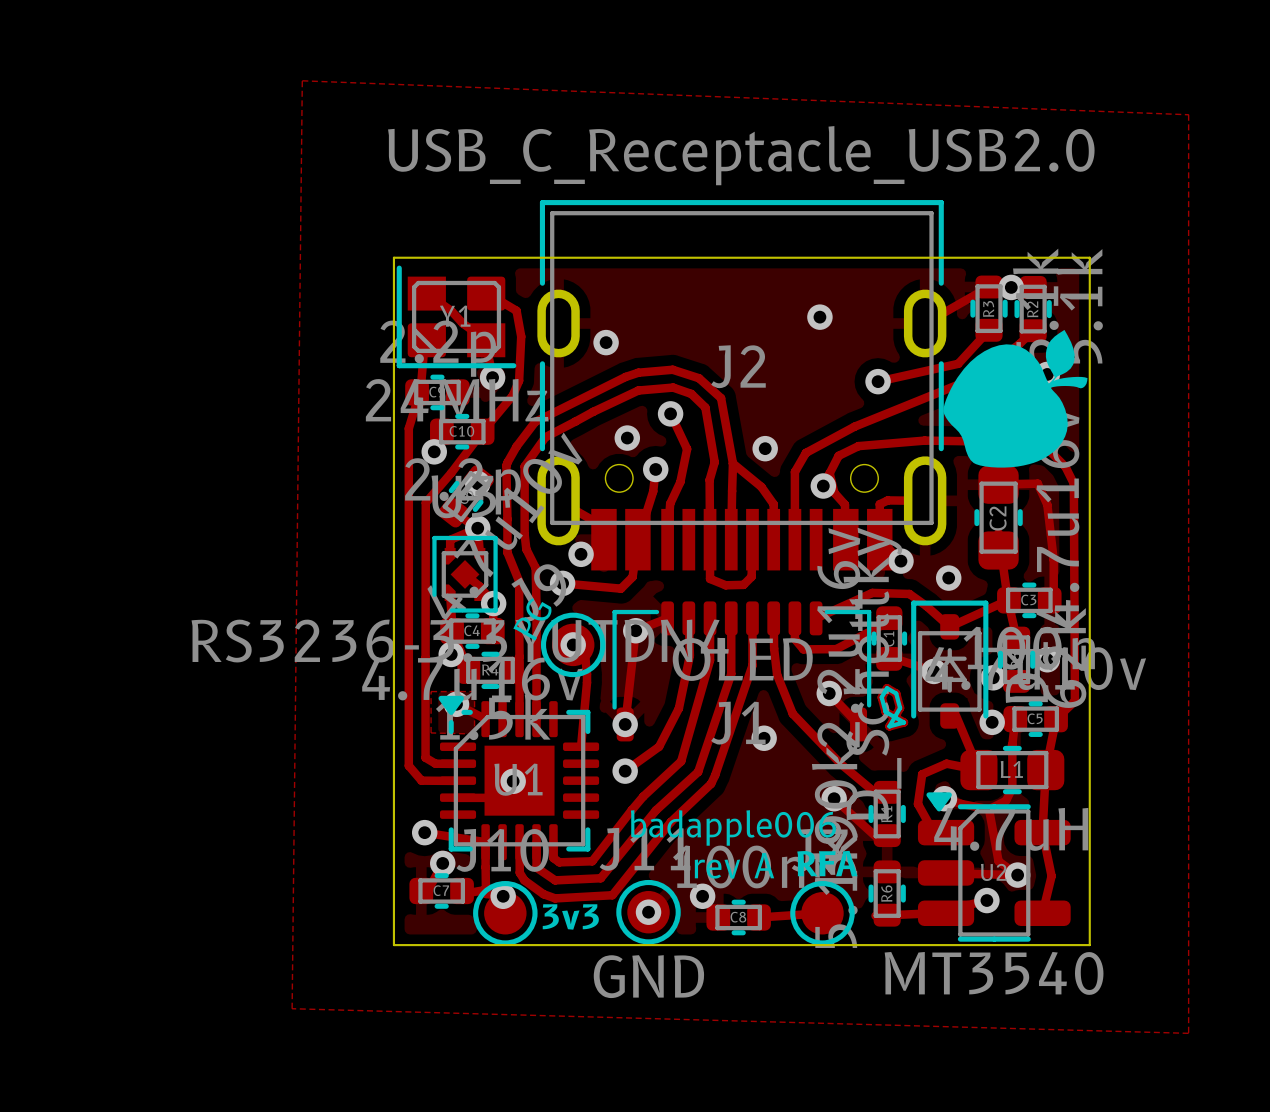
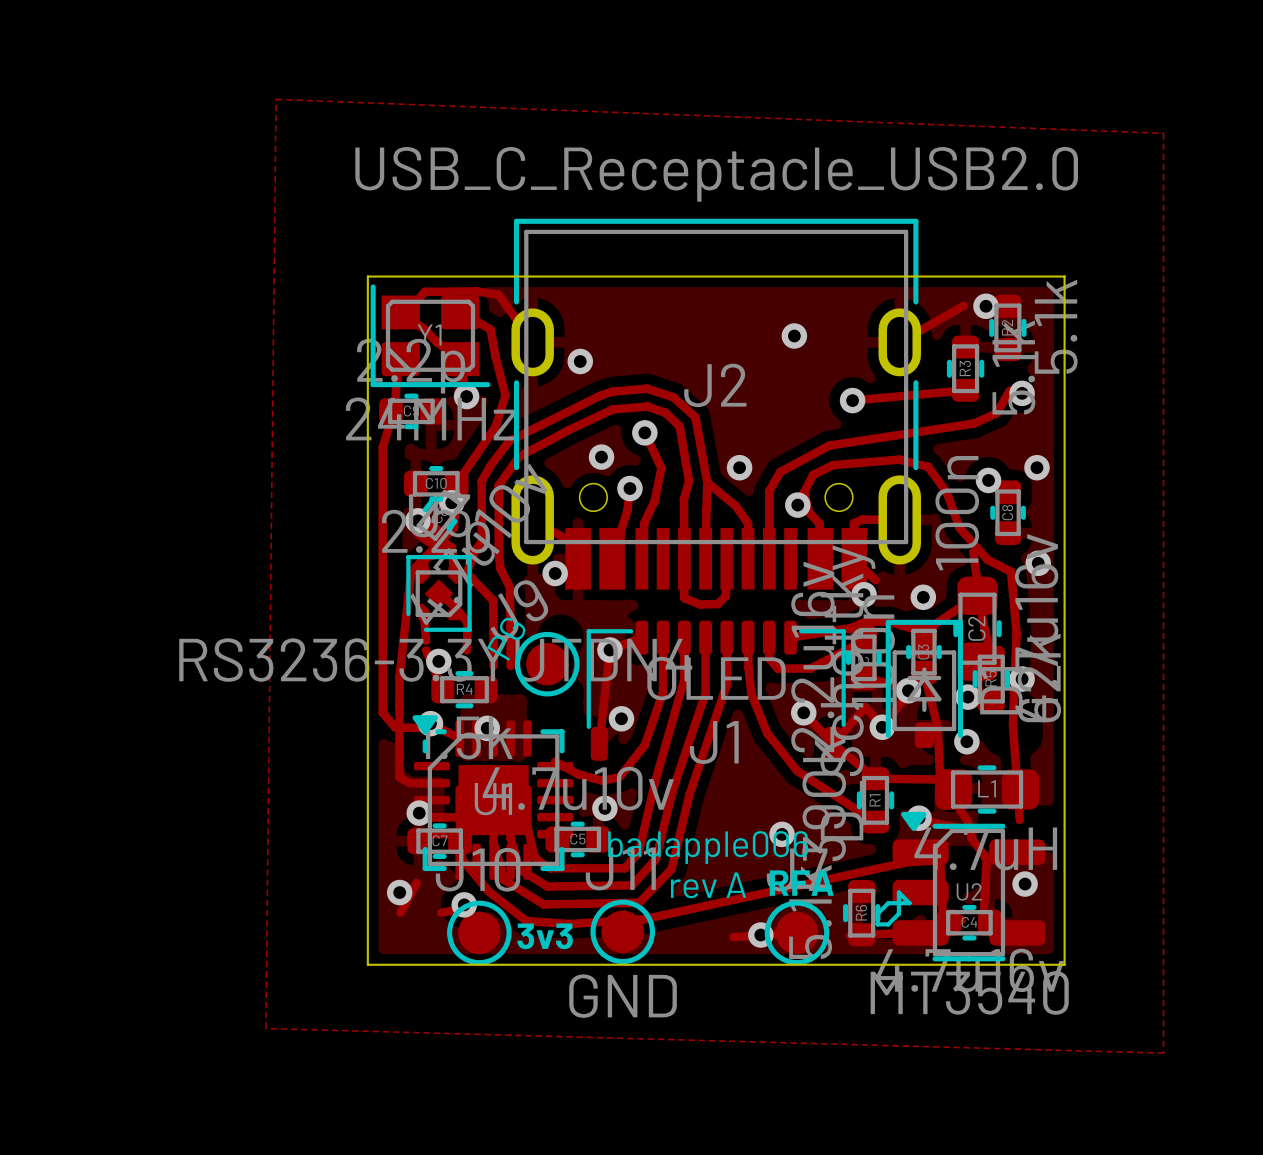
track: none -> (399, 321) (424, 291) (477, 291) (498, 294) (532, 342)
R3 position: (989, 308) -> (965, 368)
drawing: [943, 329, 1088, 468] -> none
track: (989, 330) (958, 363) (878, 381) -> (965, 390) (852, 400)
track: (1033, 330) (1018, 344) (973, 378) (854, 426) -> (1009, 390) (996, 413) (974, 423) (829, 445)
track: (521, 336) (519, 380) (512, 395) (425, 502) (425, 657) -> (495, 355) (505, 395) (495, 426) (456, 483) (454, 527) (411, 571) (399, 677)
C10 position: (462, 431) -> (436, 483)
track: (924, 440) (966, 441) (1050, 451) (1065, 466) (1073, 483) (1074, 701) (1056, 719) (1045, 770) (1042, 832) (1051, 876) (1042, 913) -> (899, 459) (928, 466) (946, 492) (959, 528) (987, 559) (1011, 571) (1016, 632) (1012, 725) (1019, 819)
via: none -> (1036, 467)
via: (434, 451) -> none
via: none -> (988, 480)
track: (507, 462) (507, 552) (519, 581) (519, 710) -> (481, 481) (481, 541) (474, 551) (466, 573)
track: (998, 484) (1037, 483) (1047, 504) (1053, 560) (1053, 600) -> none
via: none -> (417, 520)
C2 position: (998, 517) -> (977, 628)
via: (477, 528) -> none
track: (637, 539) (632, 577) (620, 588) (562, 583) -> none
via: none -> (1038, 563)
track: none -> (466, 573) (493, 600) (493, 666)
via position: (900, 561) -> (864, 594)
via: (562, 583) -> none
track: (1007, 600) (949, 626) (909, 593) (872, 592) (816, 618) -> (977, 595) (923, 631) (889, 621) (865, 621) (850, 628) (790, 637)
C3 rotation: 0° (1029, 600) -> 90° clockwise (923, 652)
C3 position: (1029, 600) -> (923, 652)
via: (493, 603) -> none
track: (688, 618) (689, 655) (678, 708) (659, 746) (625, 771) -> (663, 637) (663, 692) (644, 745) (619, 776) (602, 780) (578, 774) (555, 761)
C4 position: (472, 631) -> (969, 922)
track: (583, 641) (587, 682) (581, 746) -> none
via: (573, 644) -> none
track: (536, 646) (536, 719) -> none
via position: (451, 654) -> (438, 661)
line: (887, 688) (881, 697) (885, 711) (903, 722) (889, 726) (900, 708) (896, 693) (887, 688) -> none
track: (887, 688) (896, 693) (900, 708) (889, 726) (903, 722) (885, 711) (881, 697) (887, 688) -> none
zone outline: (431, 691) (474, 691) (474, 734) (431, 732) (431, 691) -> none
track: (408, 693) (408, 765) (421, 780) (455, 780) -> (382, 712) (395, 727) (429, 727)
via: none -> (882, 727)
via: none -> (487, 728)
track: (792, 713) (840, 763) (875, 792) -> (767, 733) (797, 771) (875, 822)
track: (956, 715) (978, 770) (946, 763) (922, 774) (917, 804) (933, 832) -> none
C5 position: (1035, 719) -> (577, 839)
track: (992, 722) (1015, 719) (1012, 744) (1012, 788) (1005, 800) (989, 809) (998, 861) (1017, 875) (933, 872) -> none
via position: (625, 724) -> (621, 718)
via: (764, 738) -> none
track: none -> (940, 779) (875, 778) (833, 743) (865, 706) (882, 727) (923, 672) (937, 726) (940, 779)
track: none -> (940, 779) (967, 821) (971, 838) (986, 858) (983, 916)
track: (681, 761) (643, 796) (592, 861) (559, 862) (553, 858) (553, 842) -> (655, 780) (638, 852) (624, 868) (550, 868) (540, 862) (534, 856) (527, 827) (527, 789)
track: none -> (459, 789) (462, 859) (488, 891) (526, 921) (569, 923) (643, 919) (906, 862) (940, 860) (942, 916)
via position: (625, 771) -> (604, 808)
track: (698, 771) (655, 810) (600, 878) (555, 880) (536, 867) (536, 842) -> (672, 791) (655, 859) (632, 885) (547, 886) (519, 869) (510, 838) (510, 789)
track: (715, 775) (711, 783) (670, 822) (612, 895) (555, 898) (543, 894) (524, 880) (519, 872) (519, 842) -> (689, 794) (671, 869) (639, 902) (543, 904) (503, 879) (493, 842) (493, 789)
via: (513, 781) -> none
via: none -> (419, 813)
track: (834, 798) (875, 836) -> none
via position: (834, 798) -> (782, 834)
R1 position: (887, 813) -> (875, 800)
track: (424, 832) (485, 842) (486, 893) (503, 896) -> none
via: (424, 832) -> none
via position: (442, 863) -> (399, 892)
line: none -> (898, 892) (909, 903) (888, 903) (877, 913) (877, 924) (888, 924) (898, 913) (898, 892)
via position: (1017, 875) -> (1025, 884)
C7 position: (441, 890) -> (439, 841)
via position: (503, 896) -> (464, 904)
via: (702, 896) -> none
via: (986, 900) -> none
via: (648, 912) -> none
via: none -> (760, 935)
C8 rotation: 0° (738, 917) -> 90° clockwise (1008, 512)
C8 position: (738, 917) -> (1008, 512)

